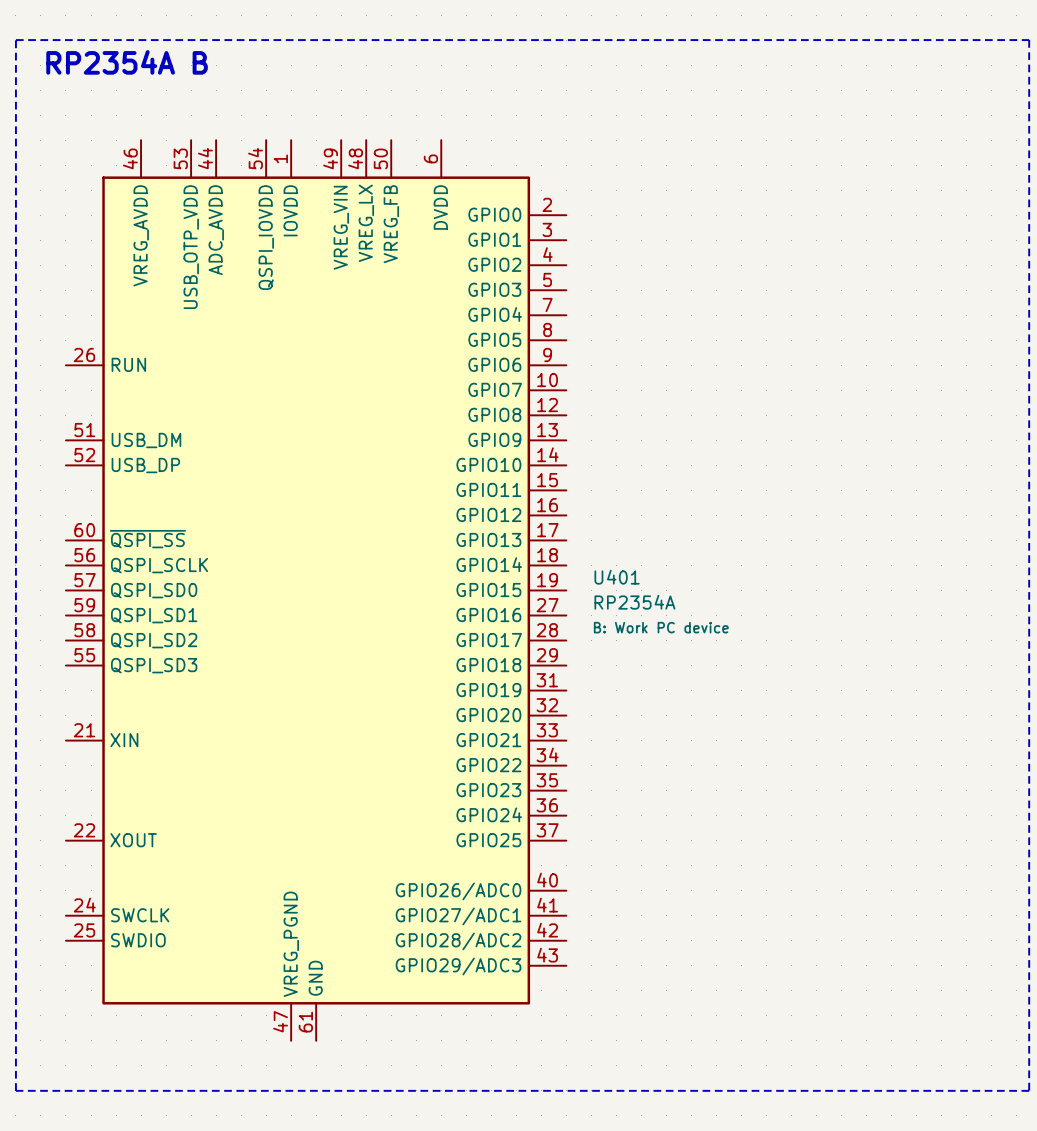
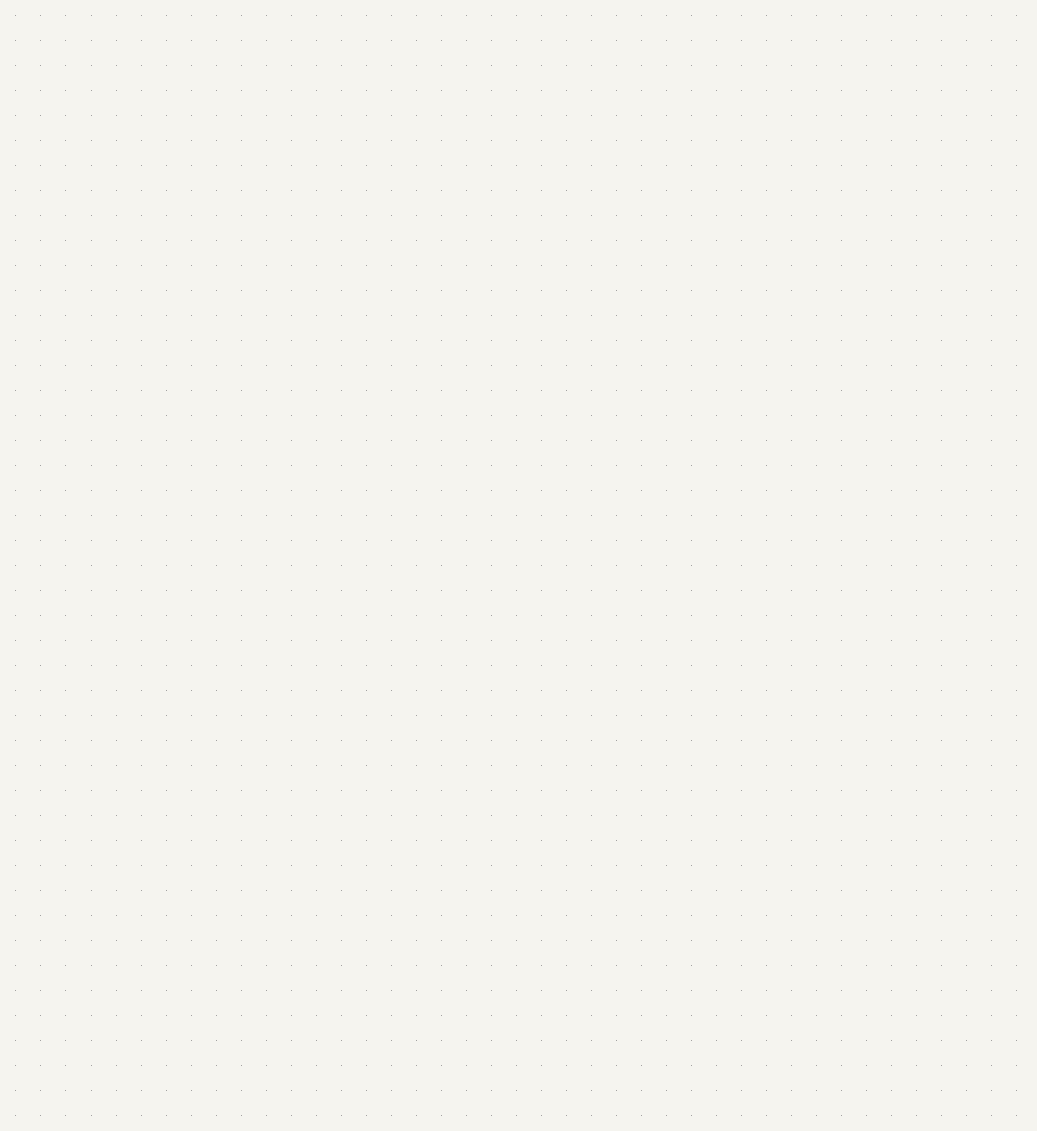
line: (15, 40) (1029, 40) (1029, 1090) (15, 1090) (15, 40) -> none
text: RP2354A B (127, 62) -> none
U401: RP2354A (316, 590) -> none

